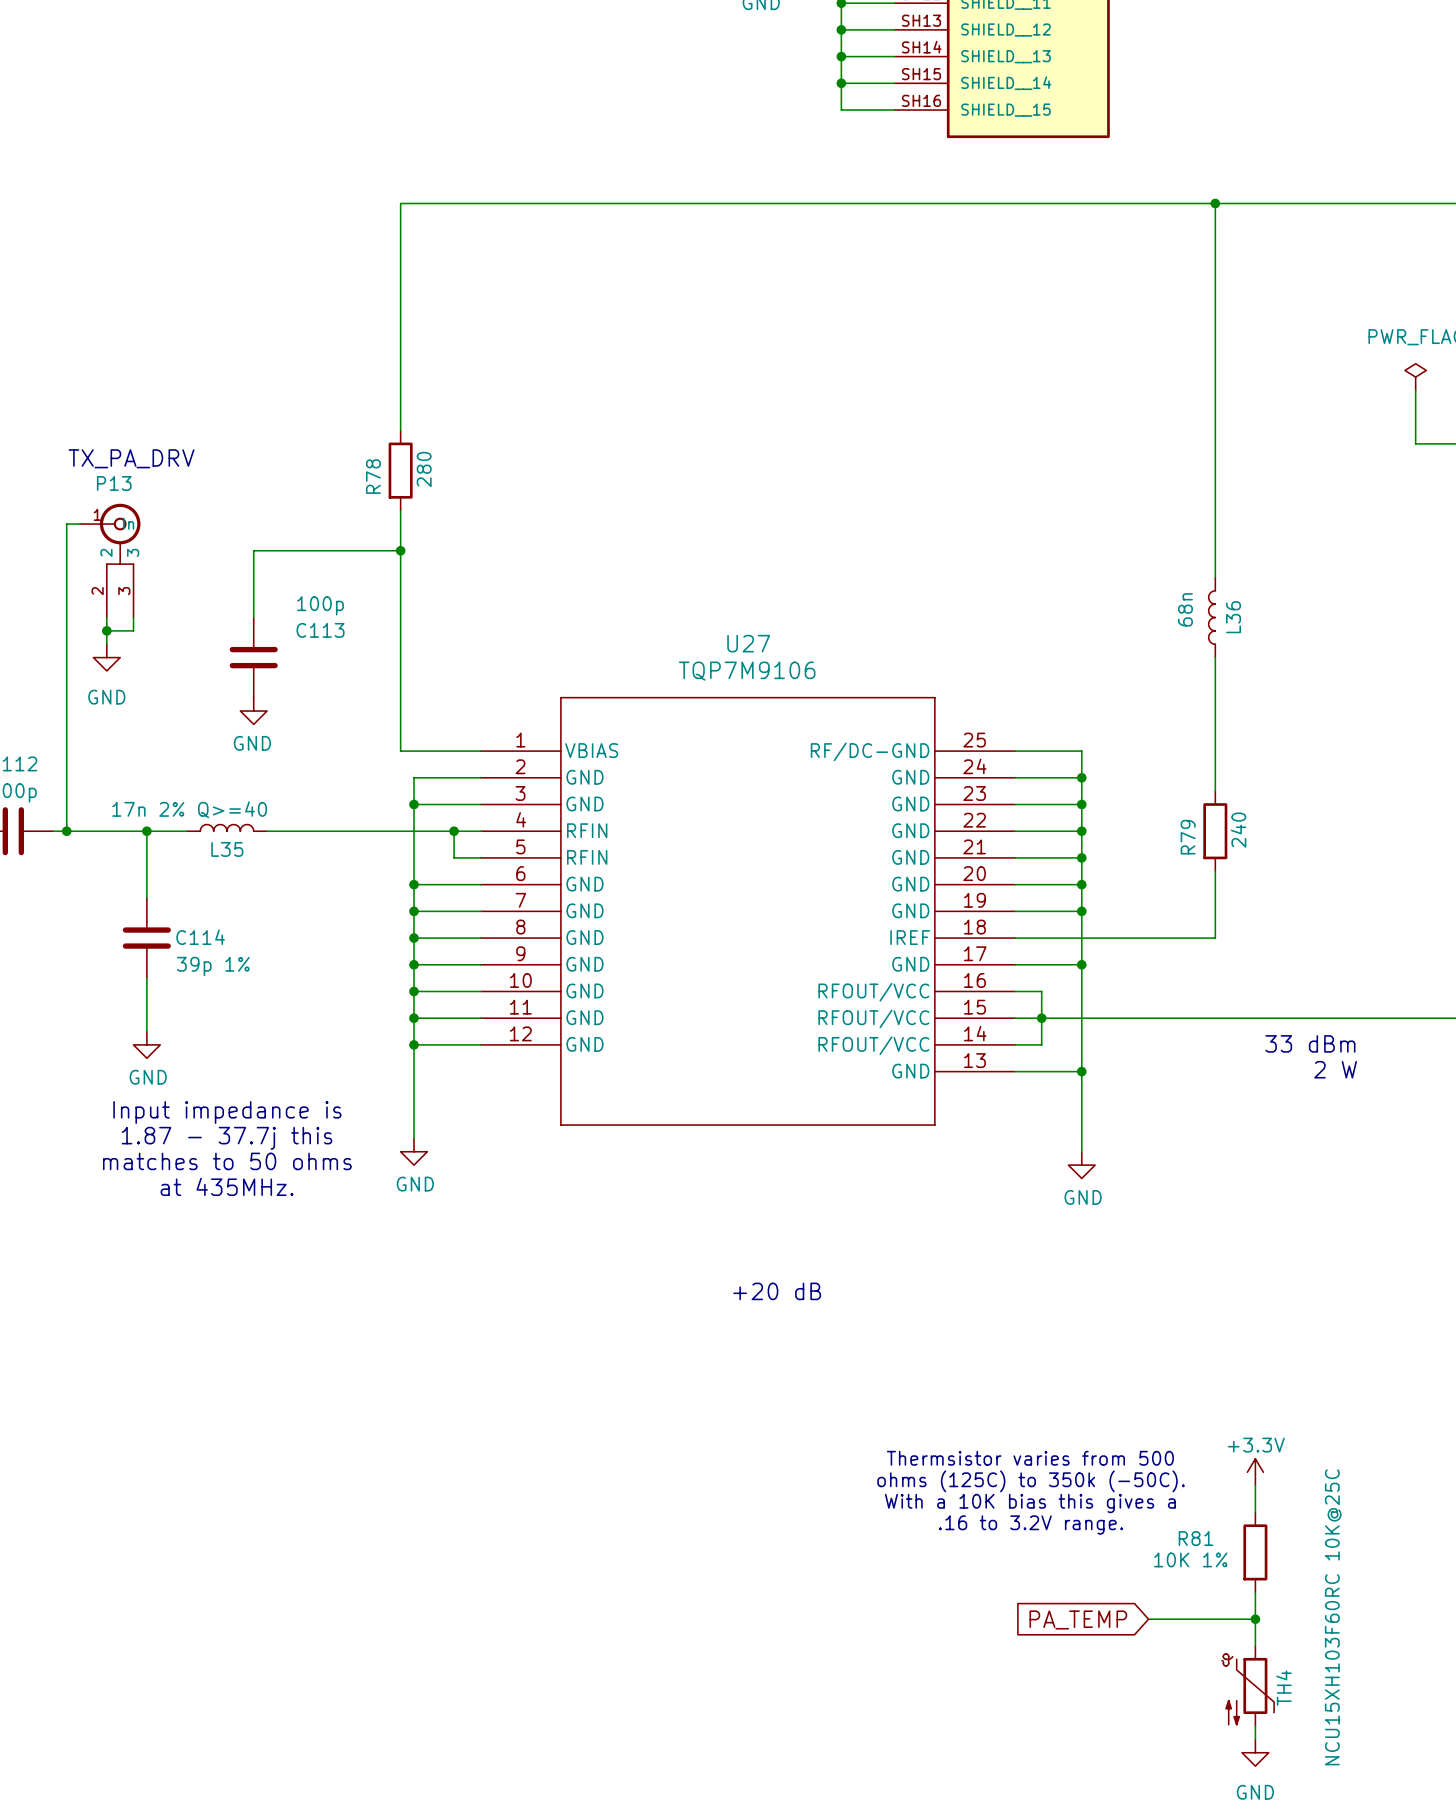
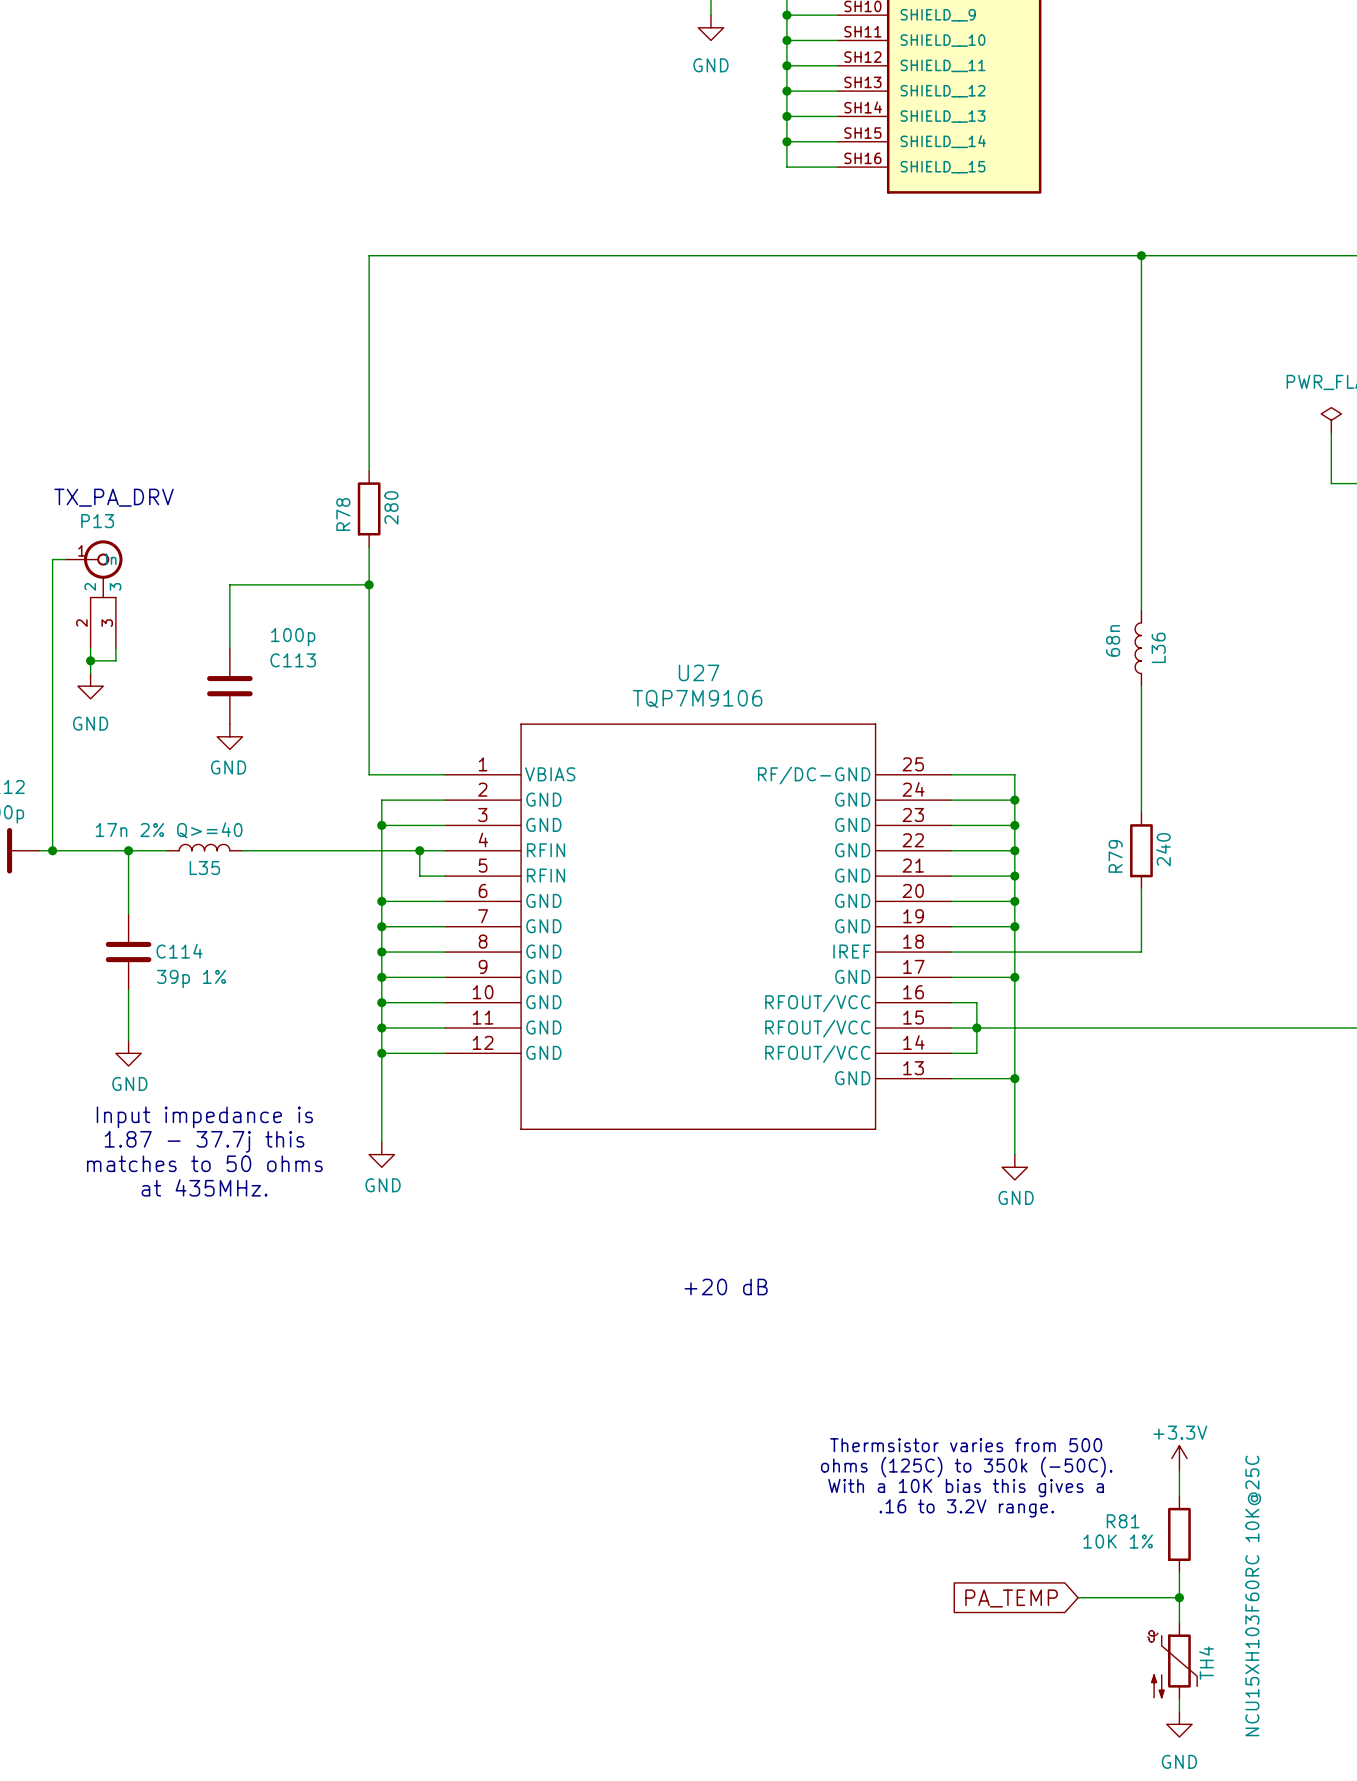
text: 33 dBm (1310, 1043) -> none
text: 2 W (1335, 1069) -> none

